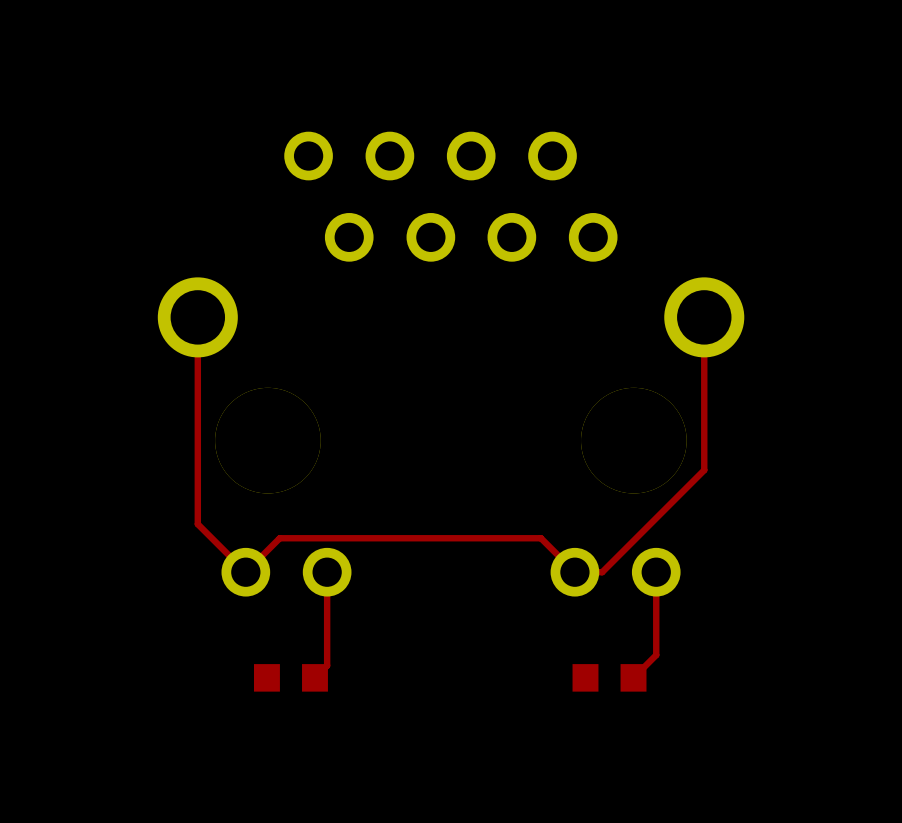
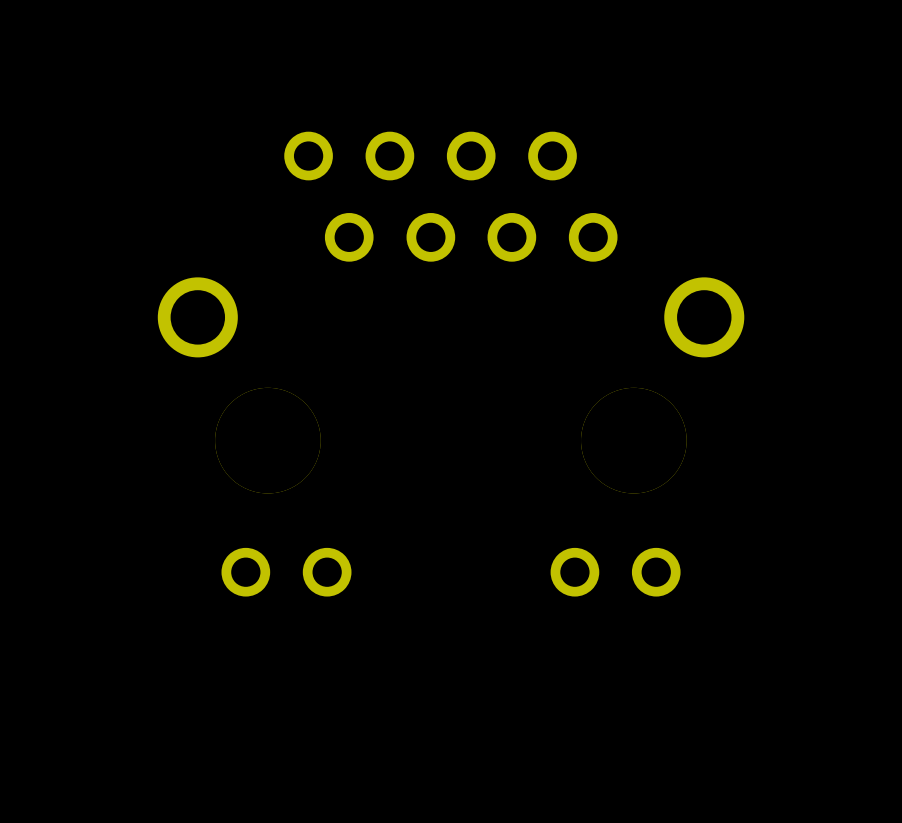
top track: (704, 317) (704, 470) (602, 572) (574, 572) (540, 538) (279, 538) (245, 572) (197, 524) (197, 317) -> none
top track: (327, 572) (327, 665) (314, 677) -> none
top track: (656, 572) (656, 655) (633, 677) -> none
part: (290, 677) -> none
part: (609, 677) -> none

